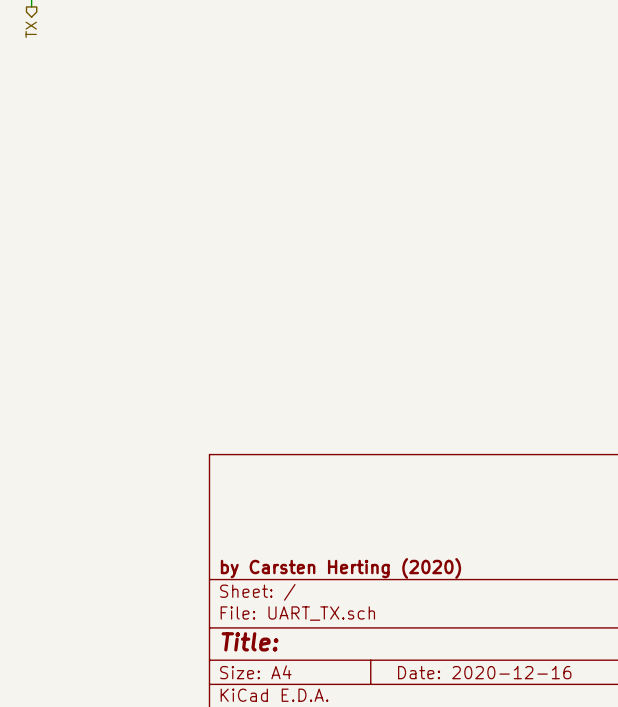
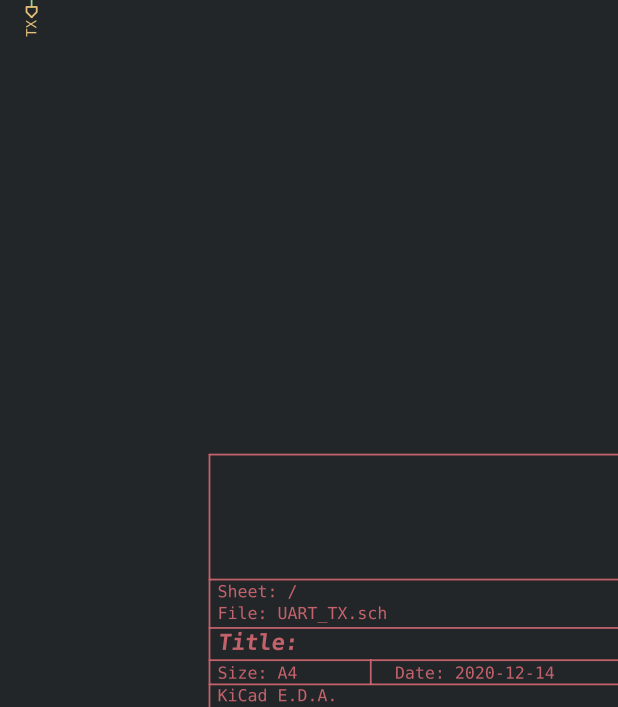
title block: by Carsten Herting (2020) (340, 568) -> none
title block: Date: 2020-12-16 (484, 672) -> Date: 2020-12-14 (475, 672)

